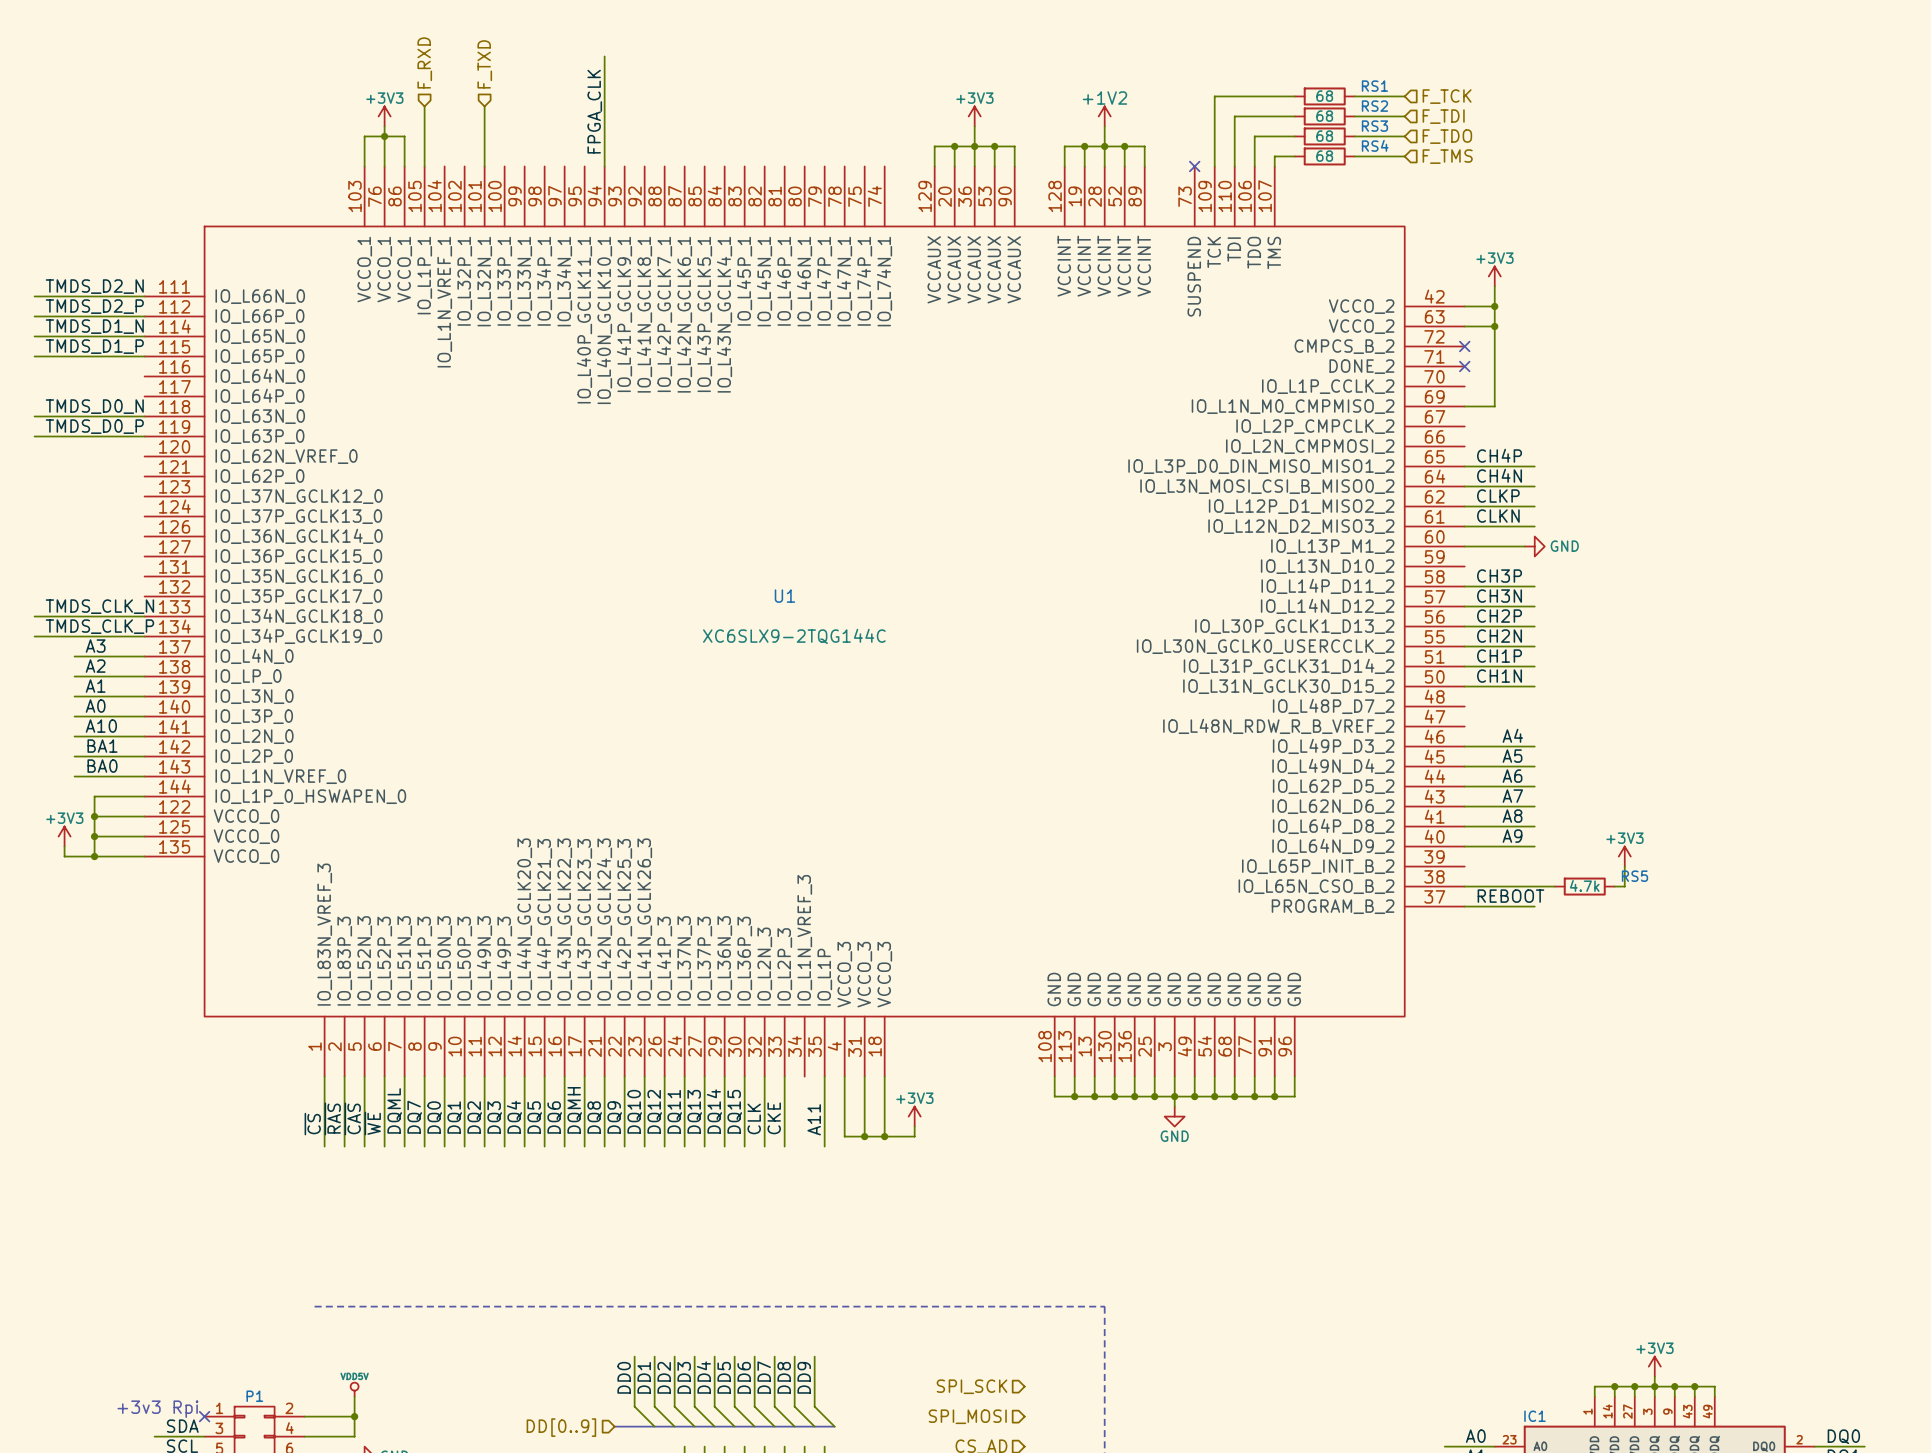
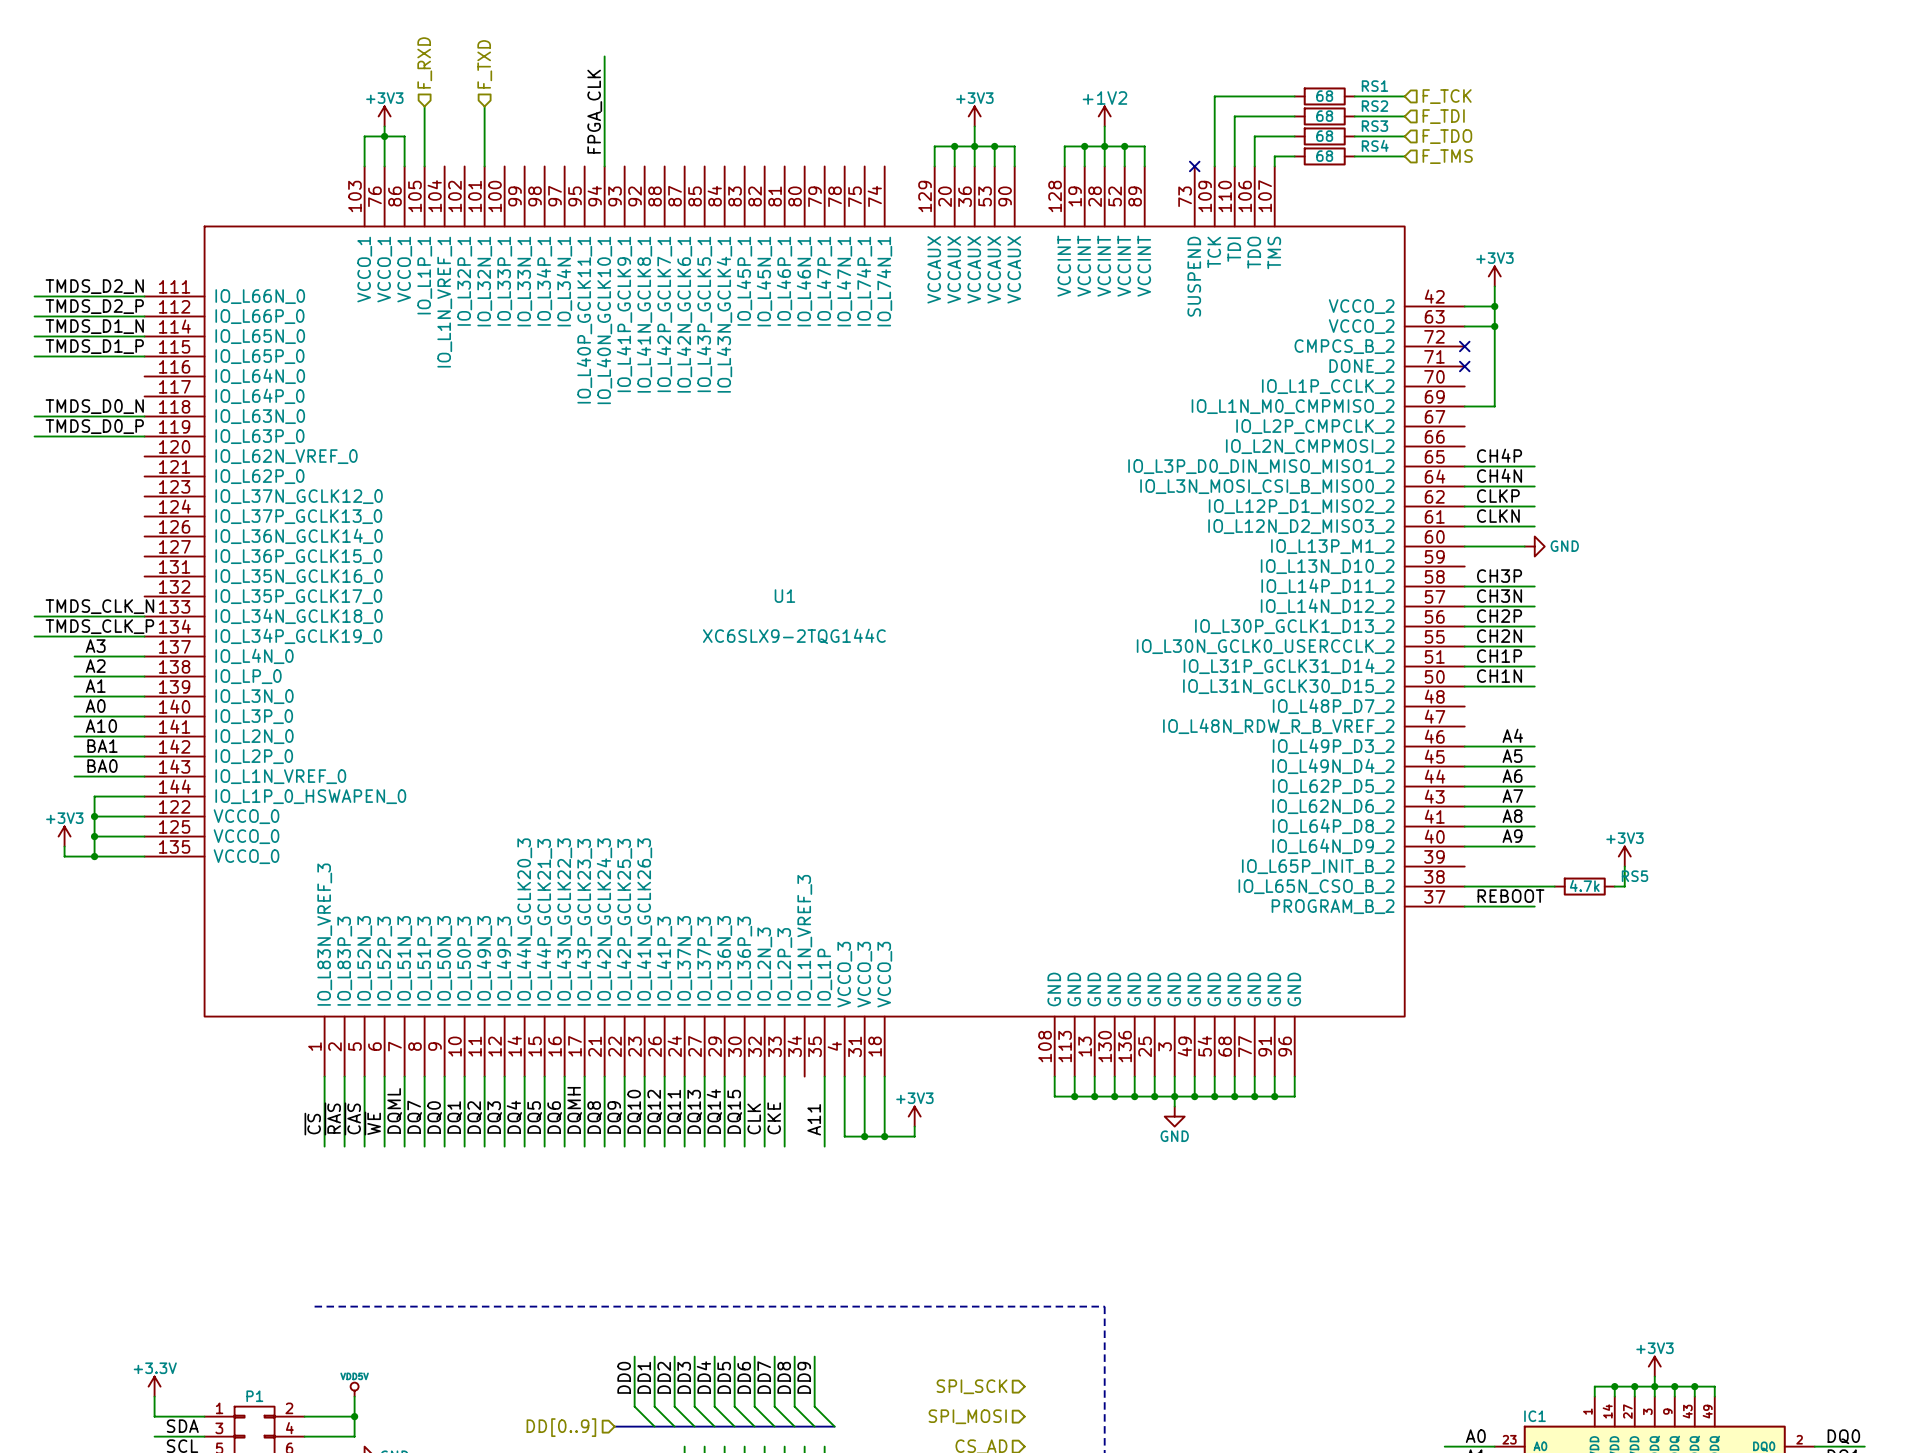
power symbol: none -> +3.3V (154, 1386)
wire: none -> (154, 1396) (154, 1416) (204, 1416)
text: +3v3 Rpi (157, 1409) -> none
no-connect mark: (204, 1416) -> none

